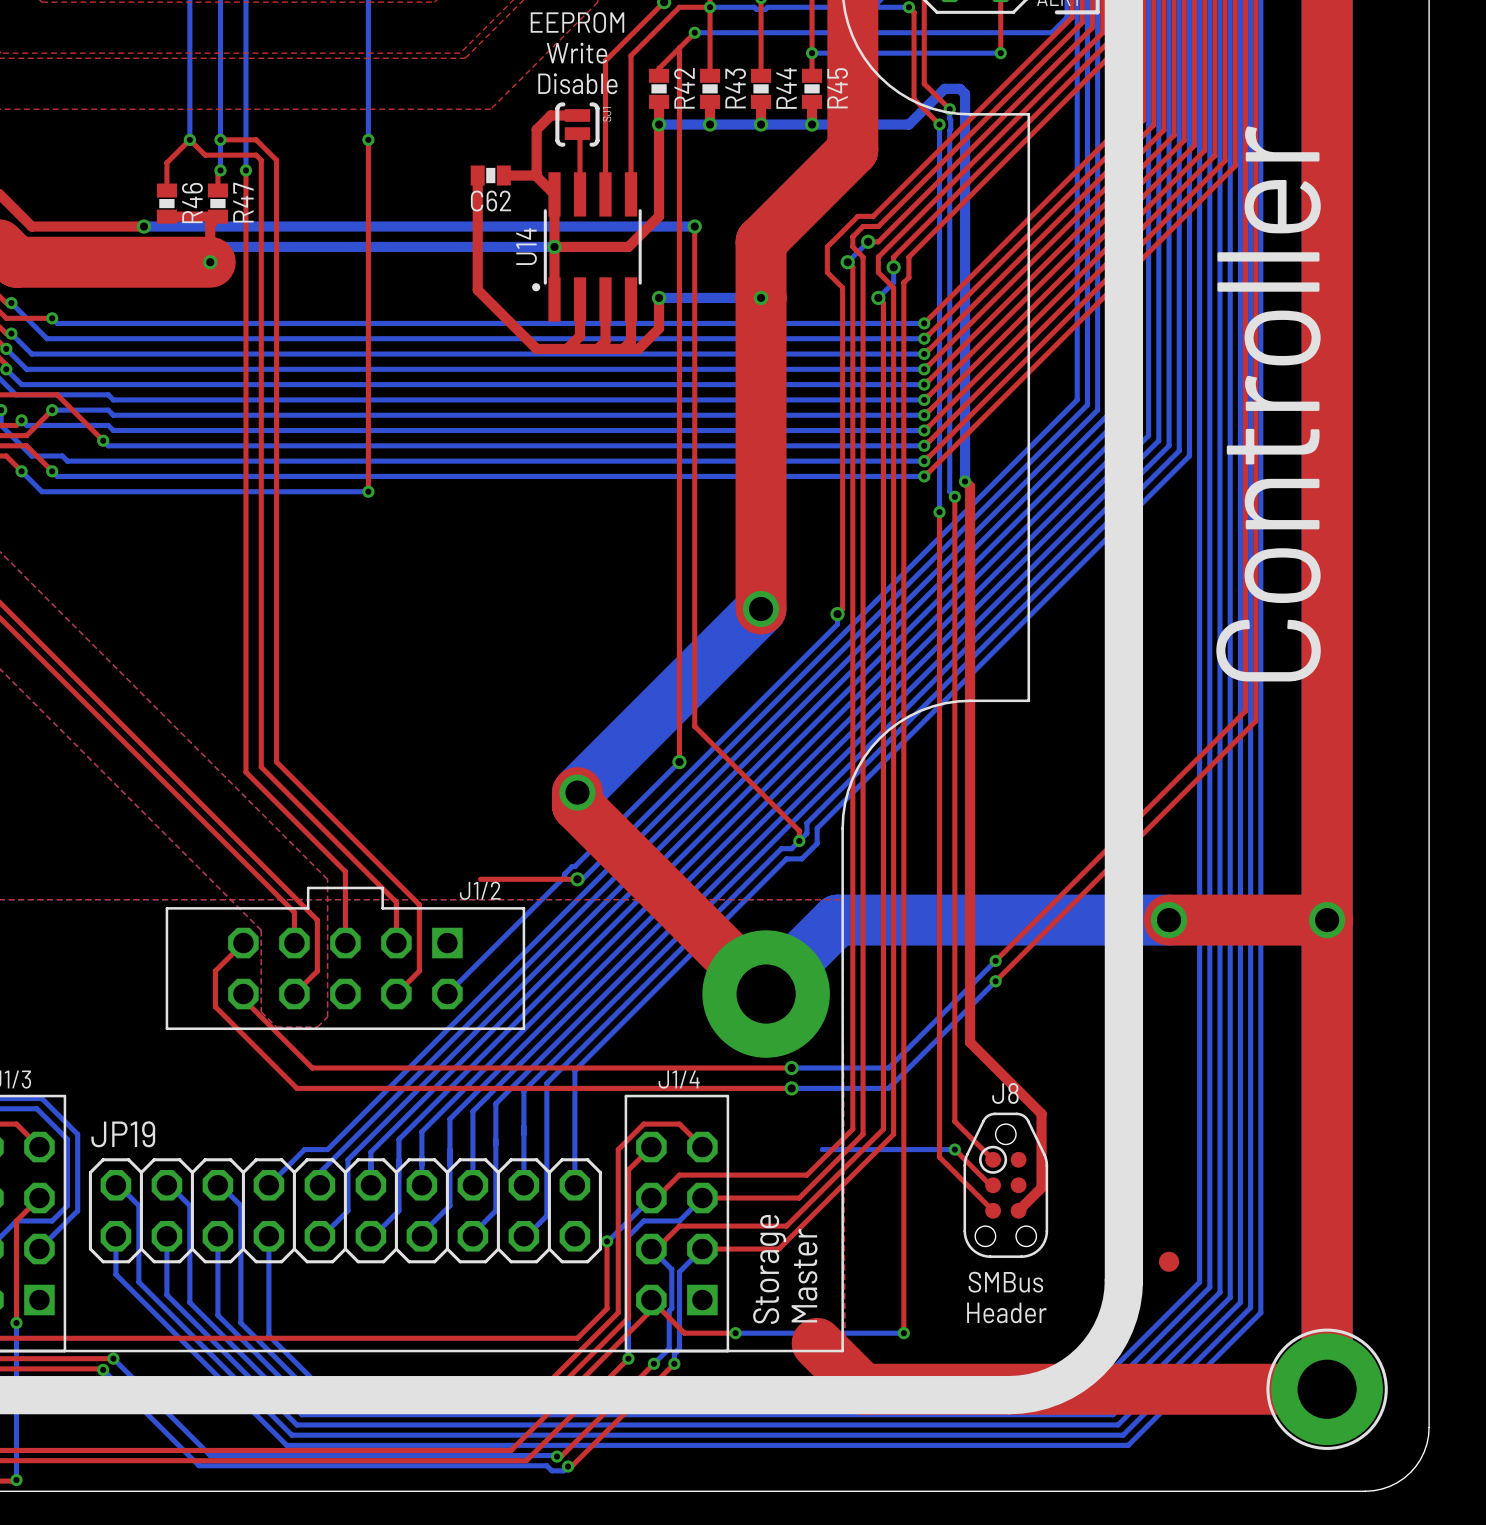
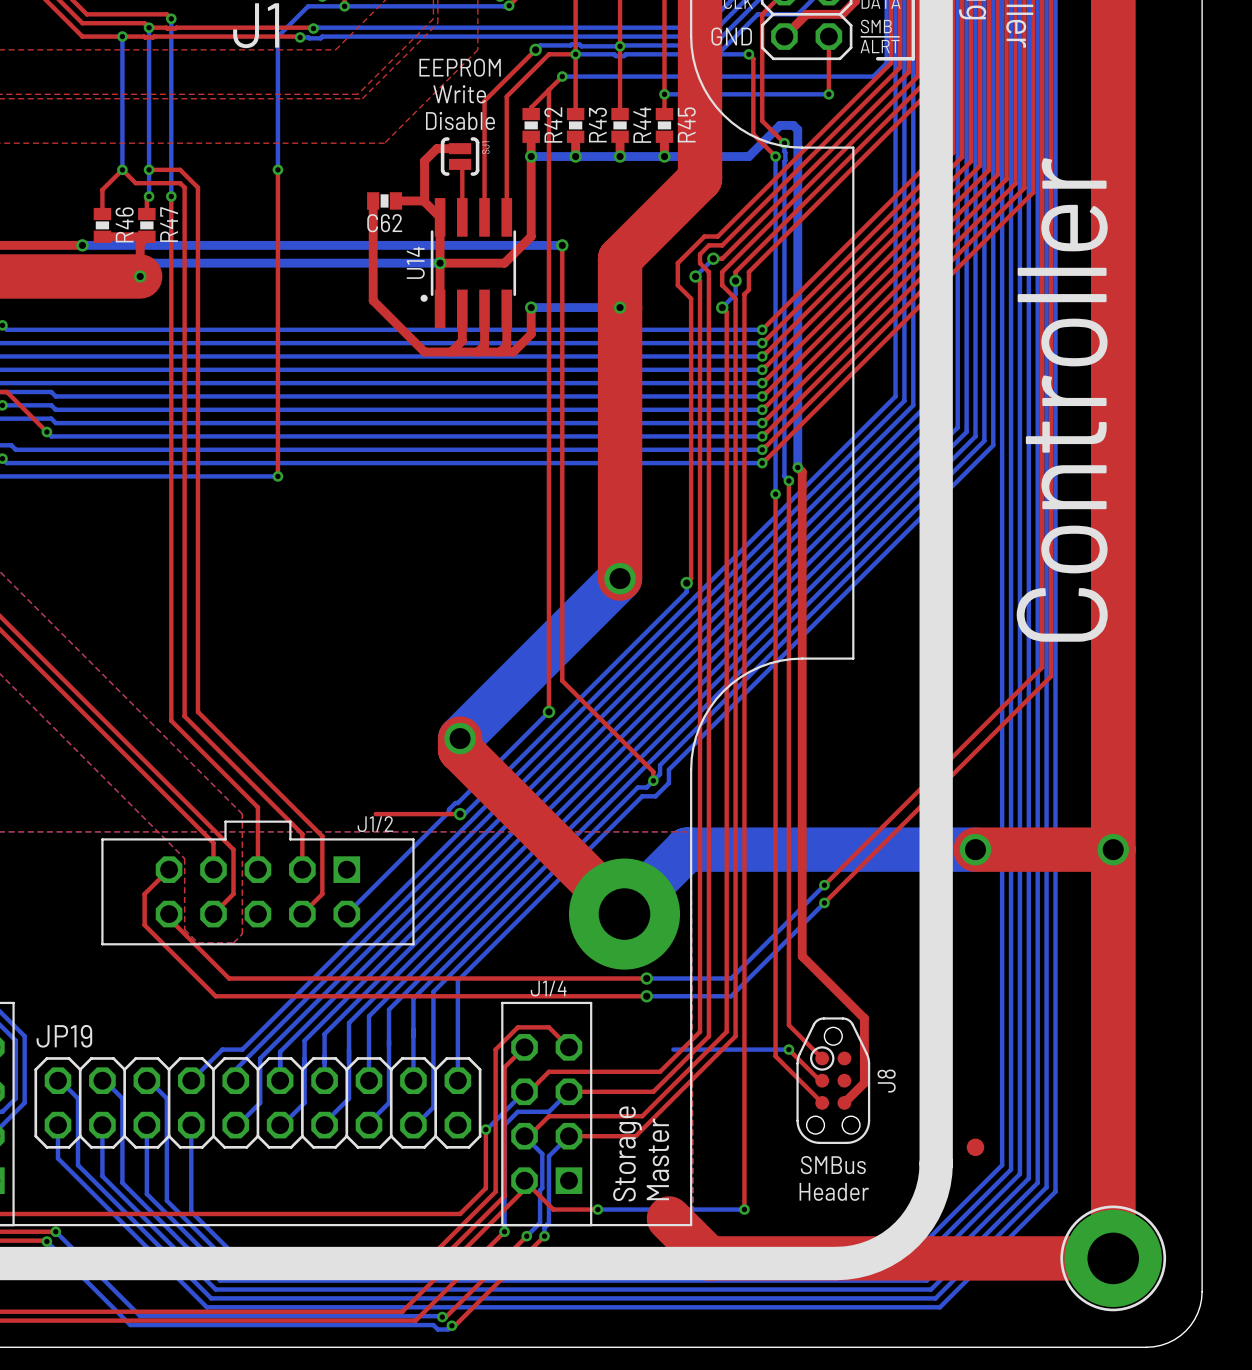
J8 name rotation: 0° (1005, 1093) -> 90° counterclockwise (886, 1081)
J8 name position: J8 (1005, 1093) -> J8 (886, 1081)

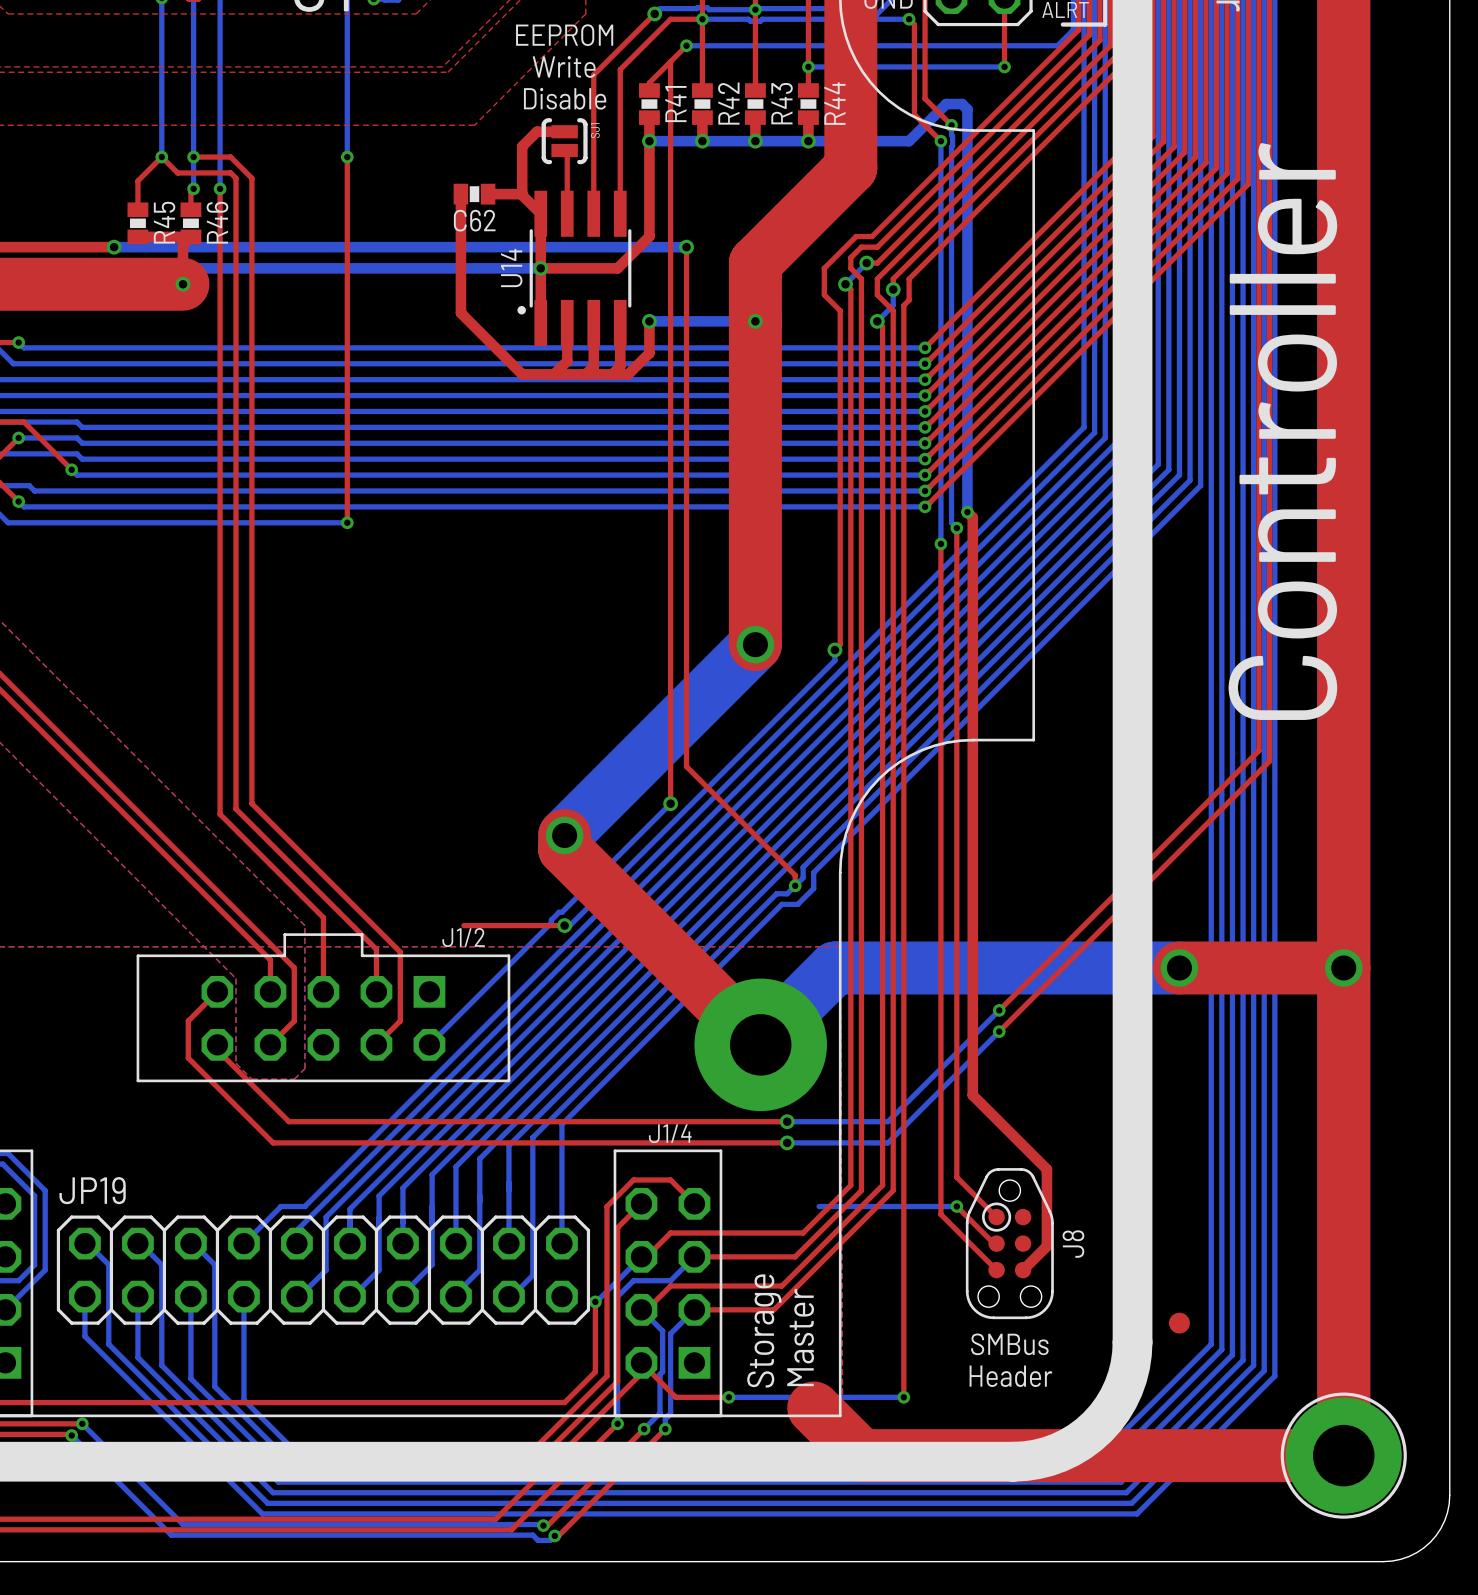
R45 name: R45 (686, 124) -> R44 (834, 103)
R42 name: R42 (553, 125) -> R41 (675, 104)
R43 name: R43 (597, 125) -> R42 (728, 103)
R44 name: R44 (642, 125) -> R43 (782, 103)
R46 name: R46 (124, 224) -> R45 (164, 222)
R47 name: R47 (169, 224) -> R46 (217, 222)

